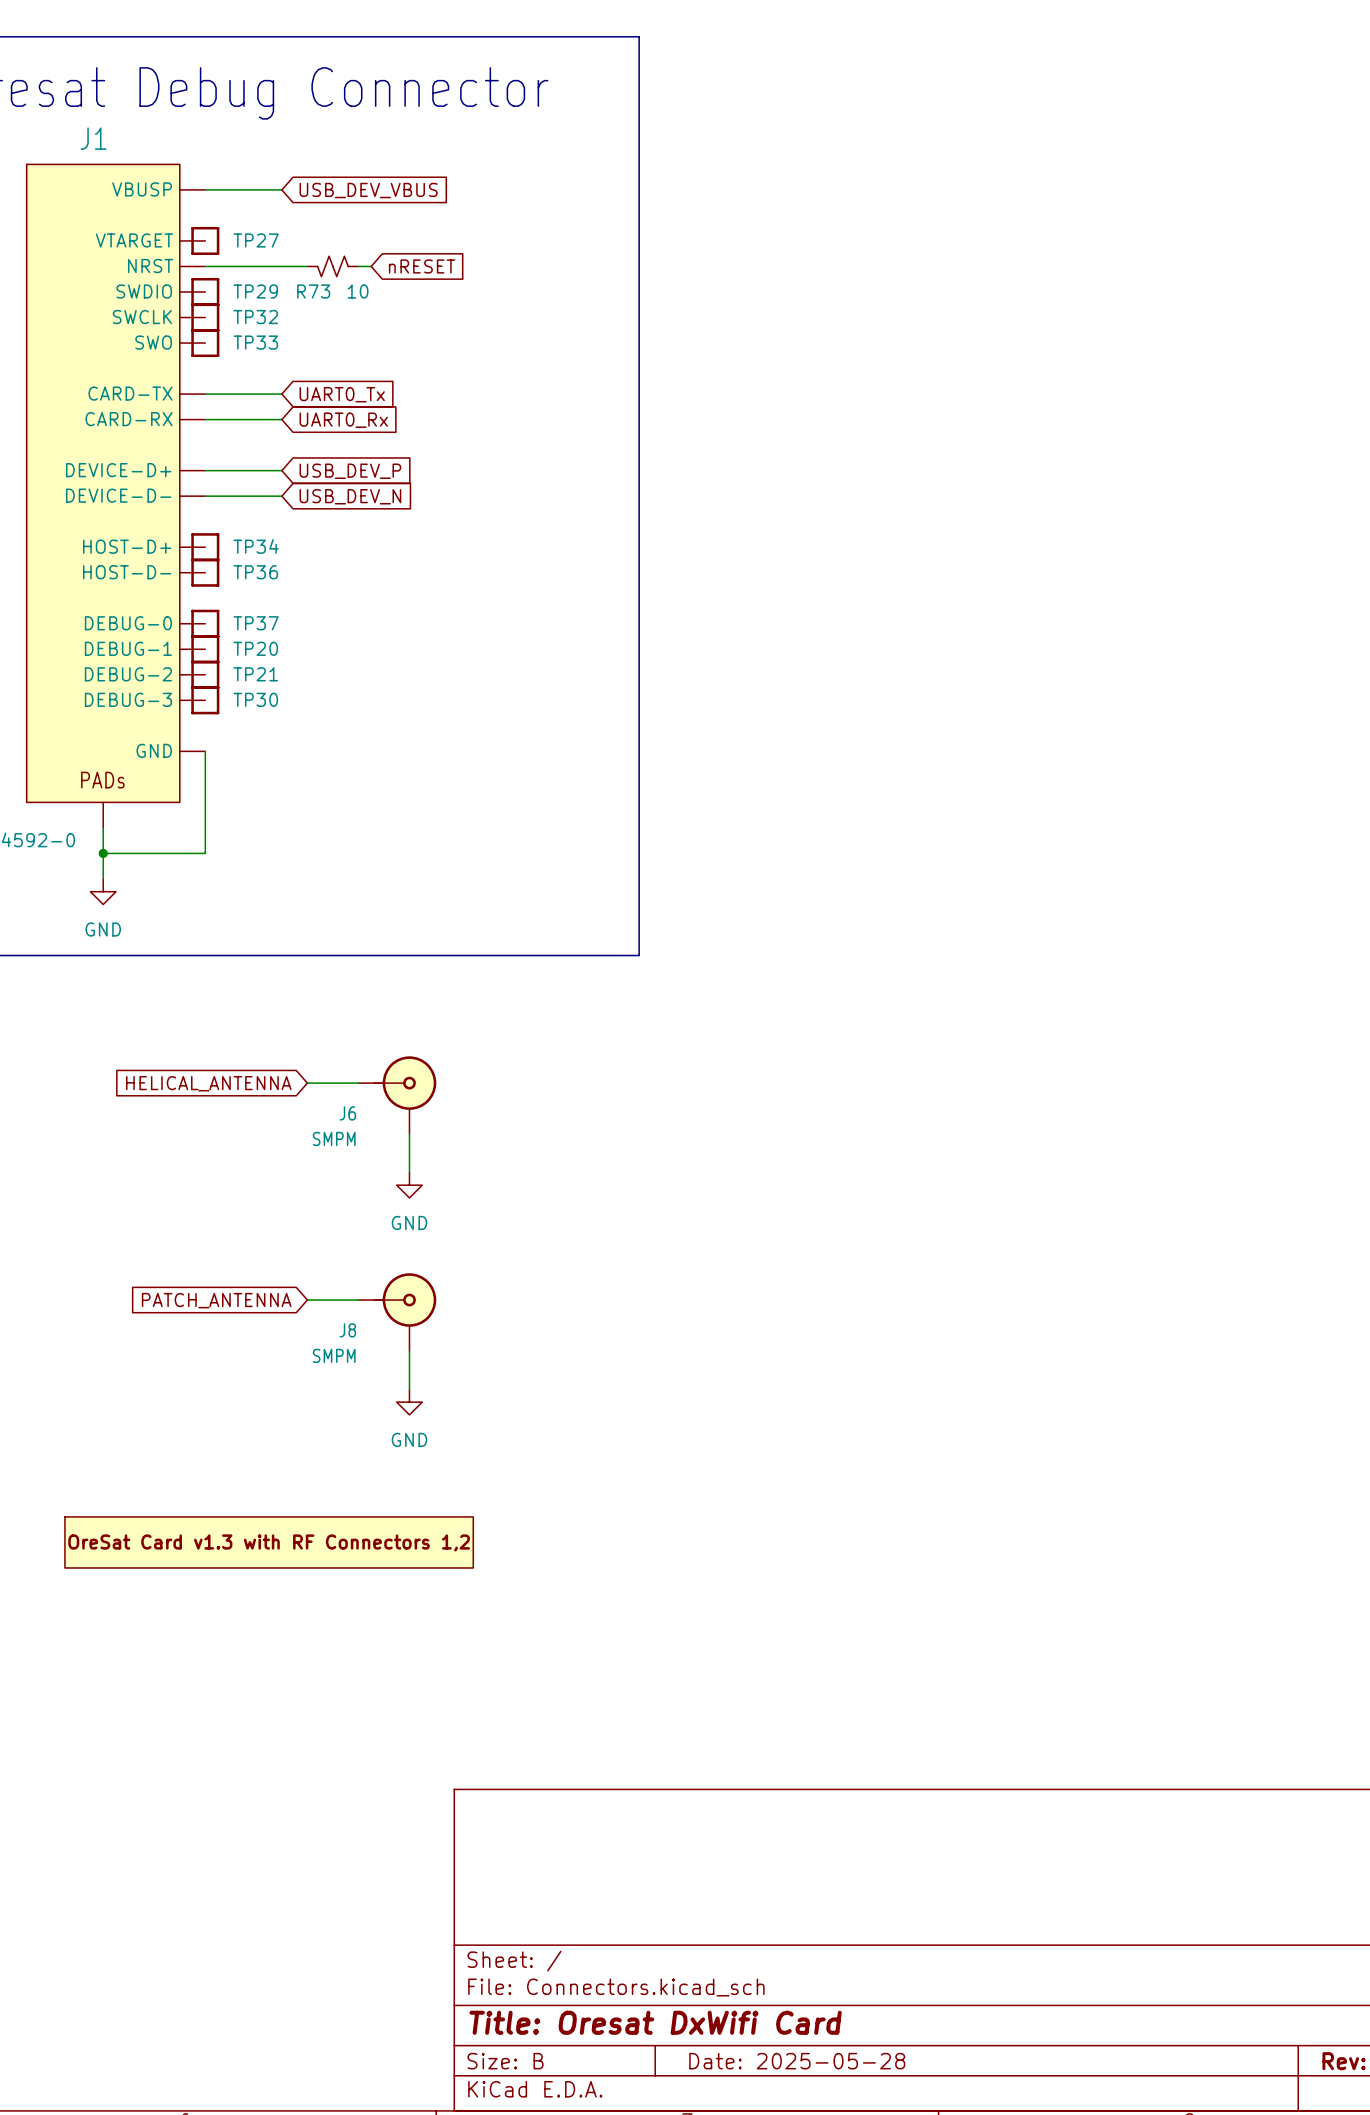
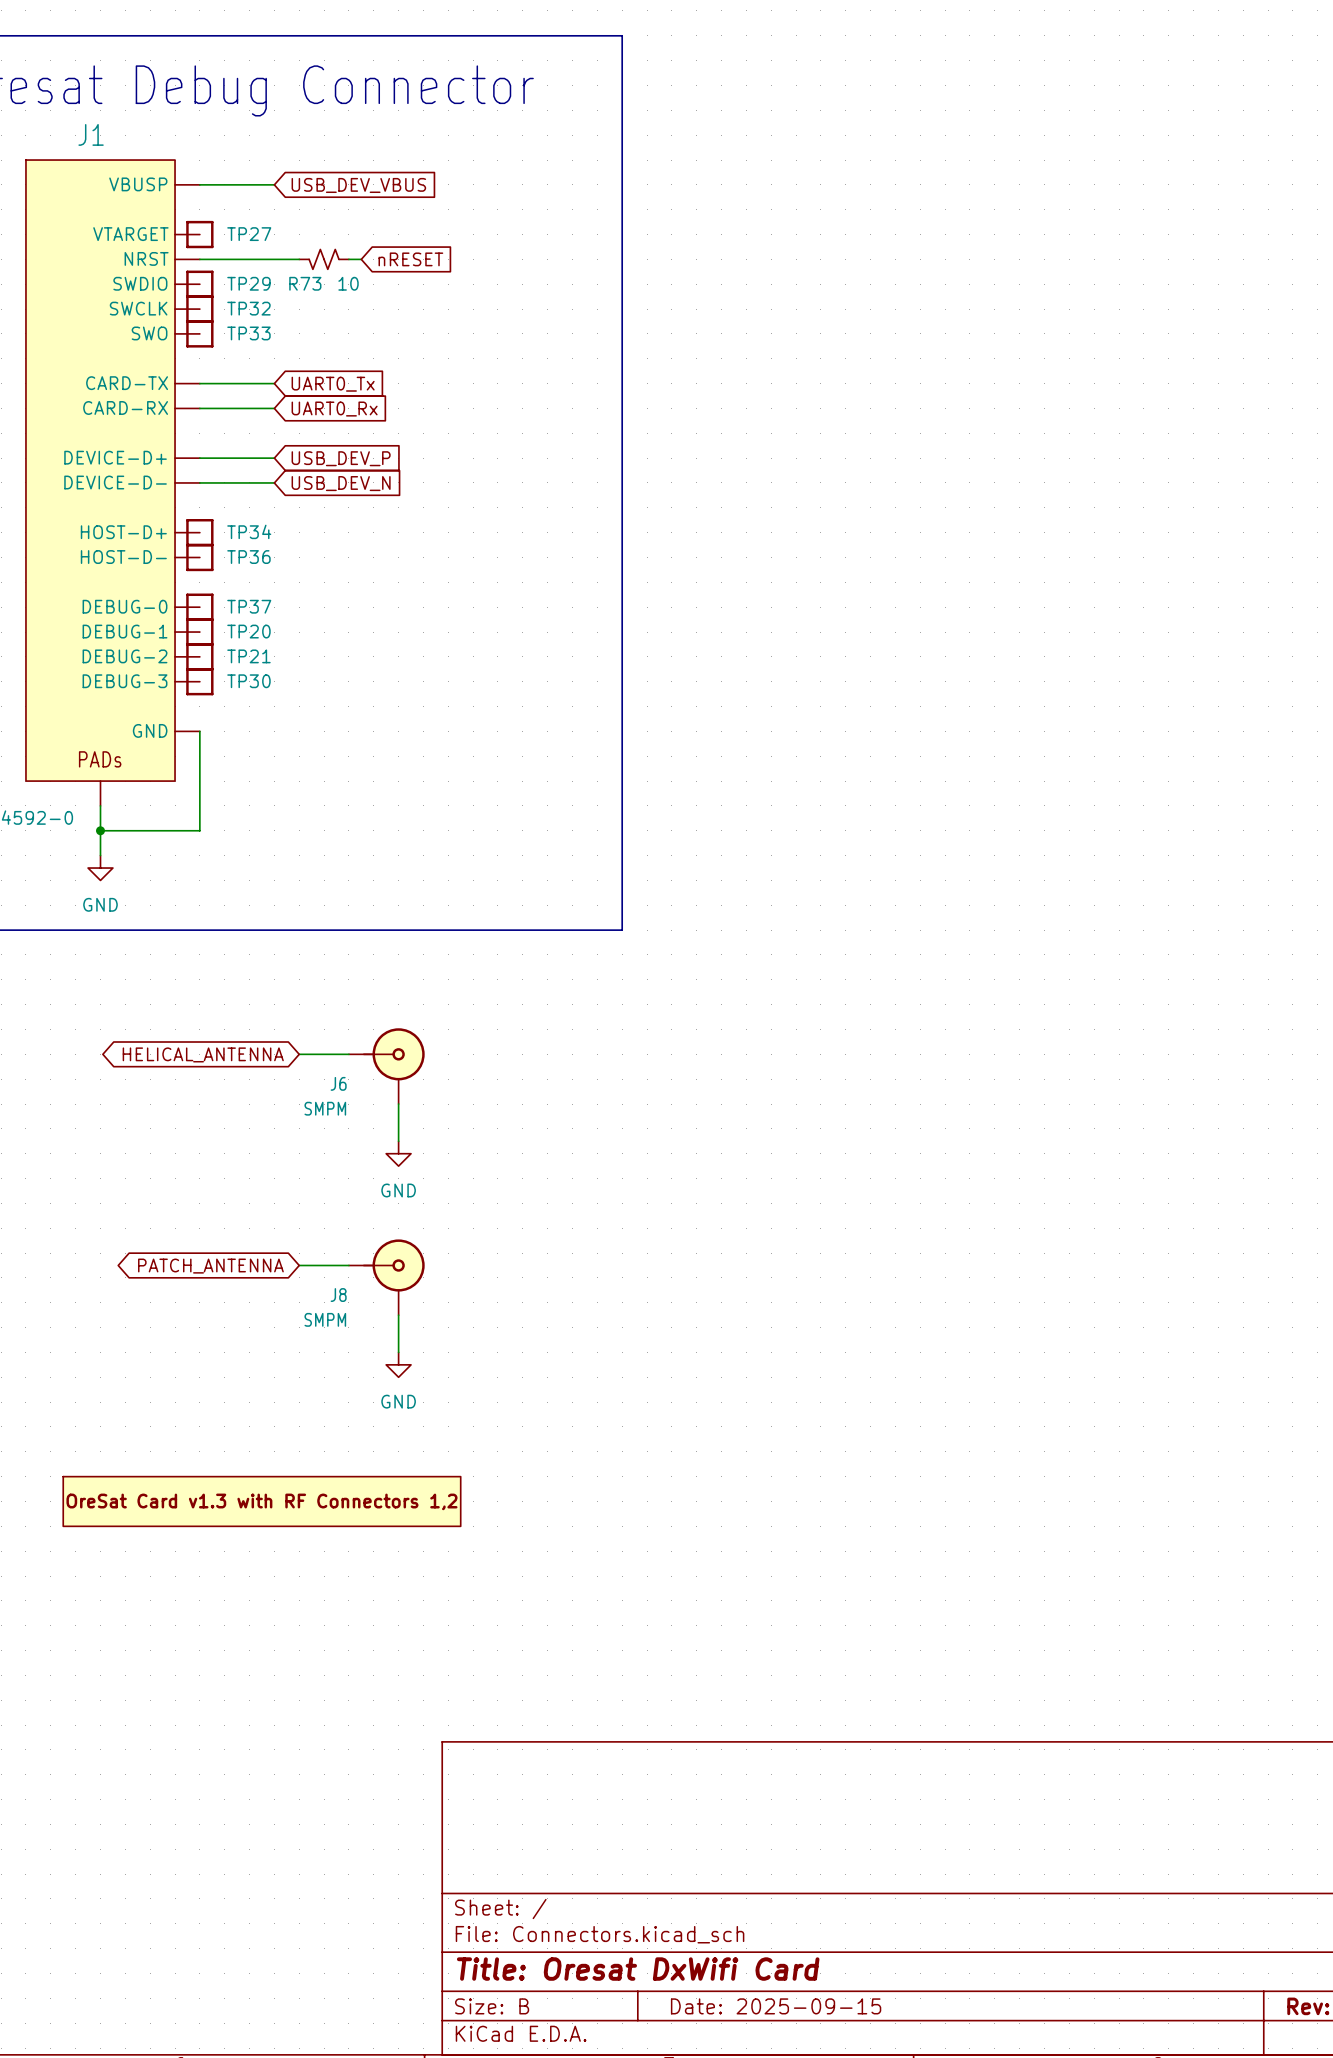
global label shape: input (208, 1083) -> bidirectional (203, 1054)
global label shape: input (216, 1300) -> bidirectional (210, 1266)
title block: Date: 2025-05-28 (797, 2061) -> Date: 2025-09-15 (776, 2006)

